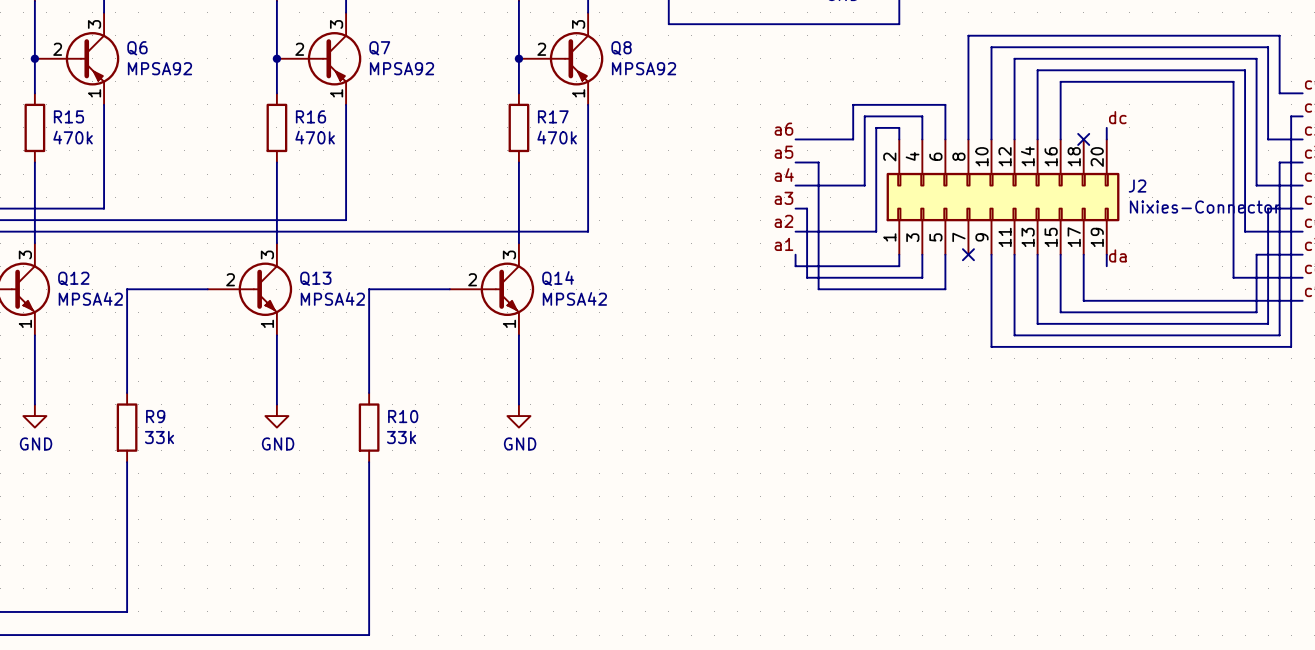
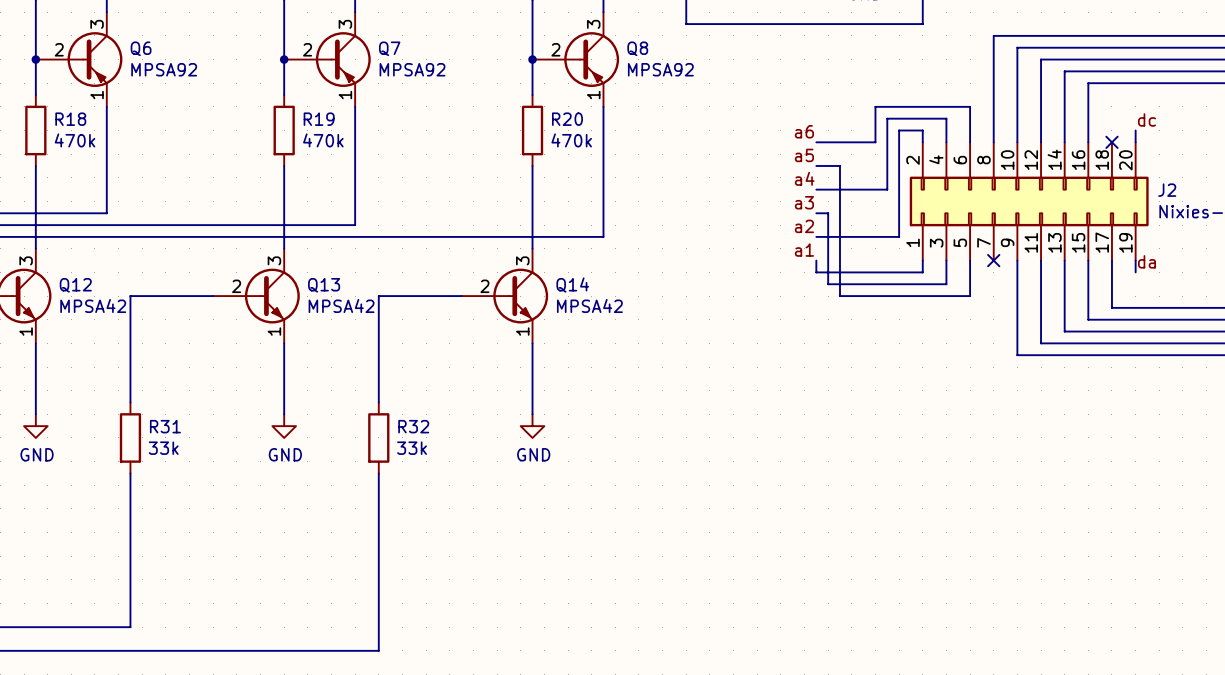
R15 name: R15 (68, 116) -> R18 (70, 119)
R16 name: R16 (310, 116) -> R19 (319, 119)
R17 name: R17 (553, 116) -> R20 (567, 119)
R9 name: R9 (155, 416) -> R31 (165, 426)
R10 name: R10 (403, 416) -> R32 (413, 426)

